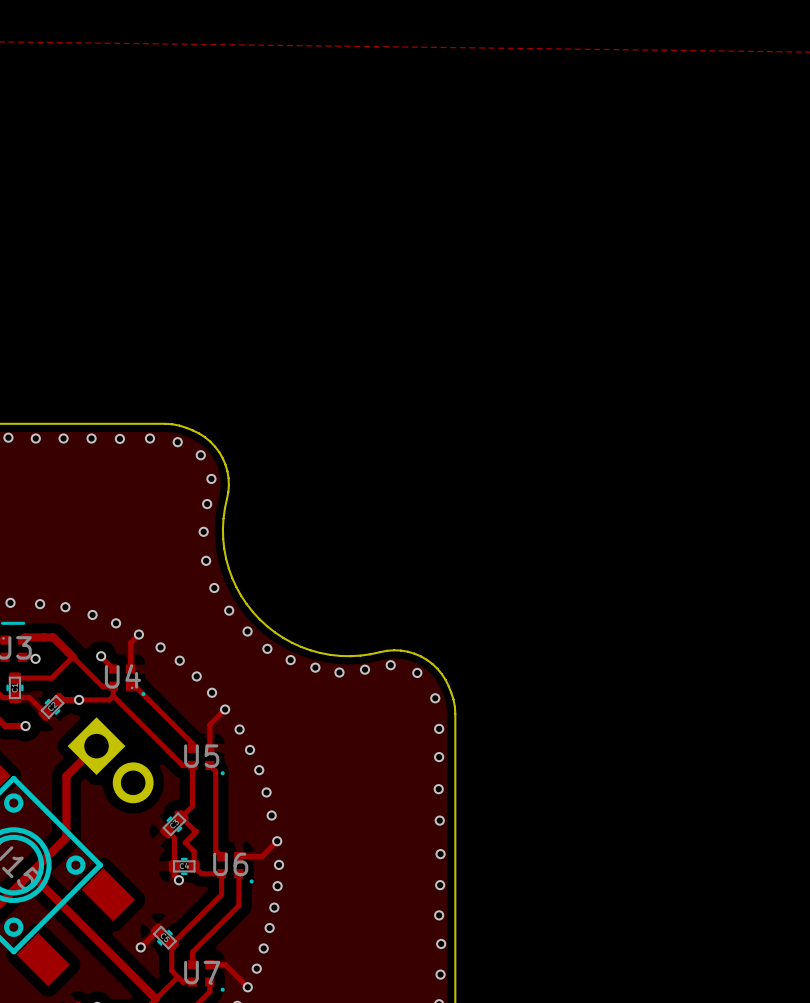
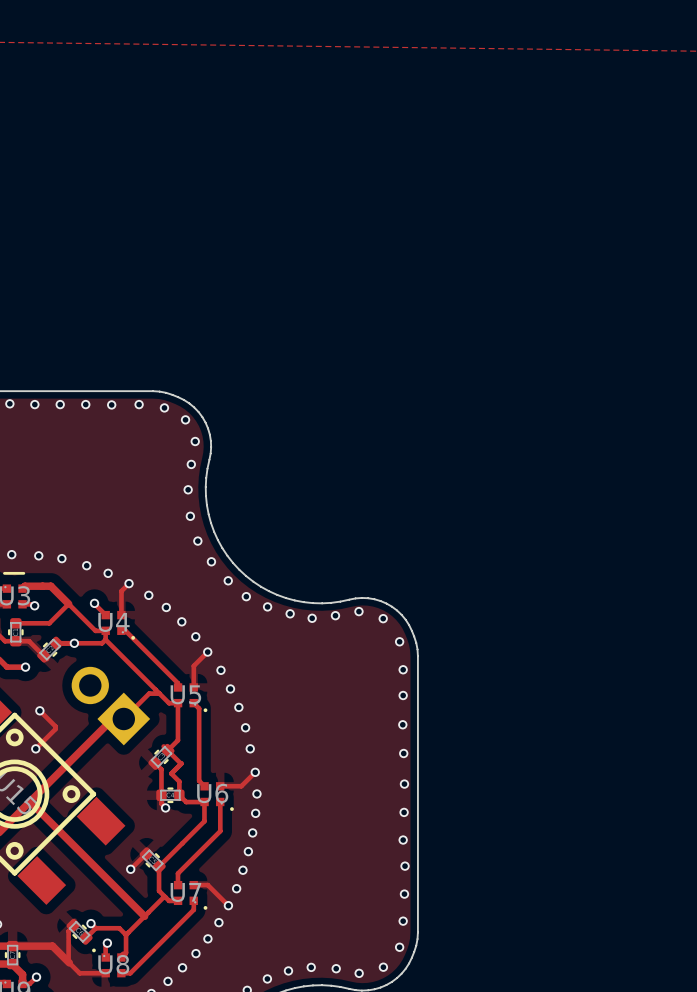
track: (96, 746) (66, 776) (66, 837) -> (112, 718) (62, 768)
track: none -> (159, 693) (149, 693) (123, 718)
part rotation: 0° (110, 760) -> 180° (110, 706)
track: none -> (39, 710) (55, 726) (55, 729) (35, 748)
via: none -> (39, 710)
via: none -> (35, 748)

